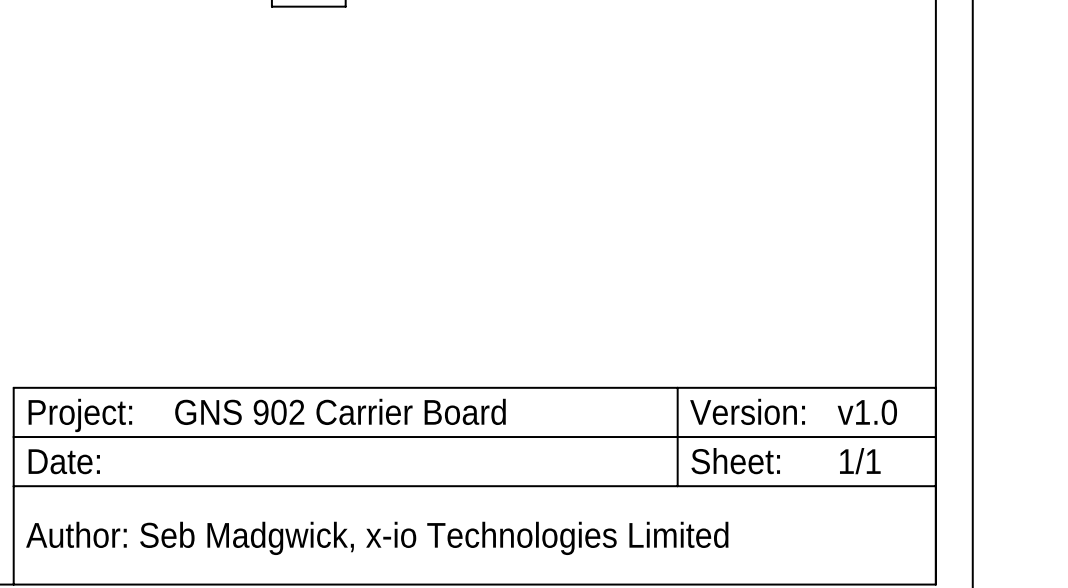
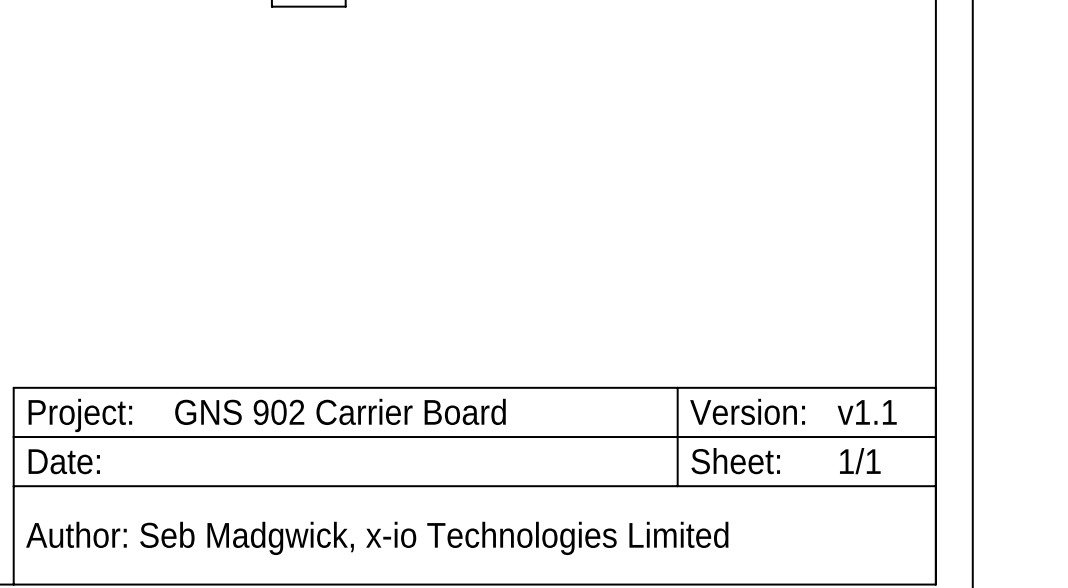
text: v1.0 (867, 412) -> v1.1 (867, 412)

